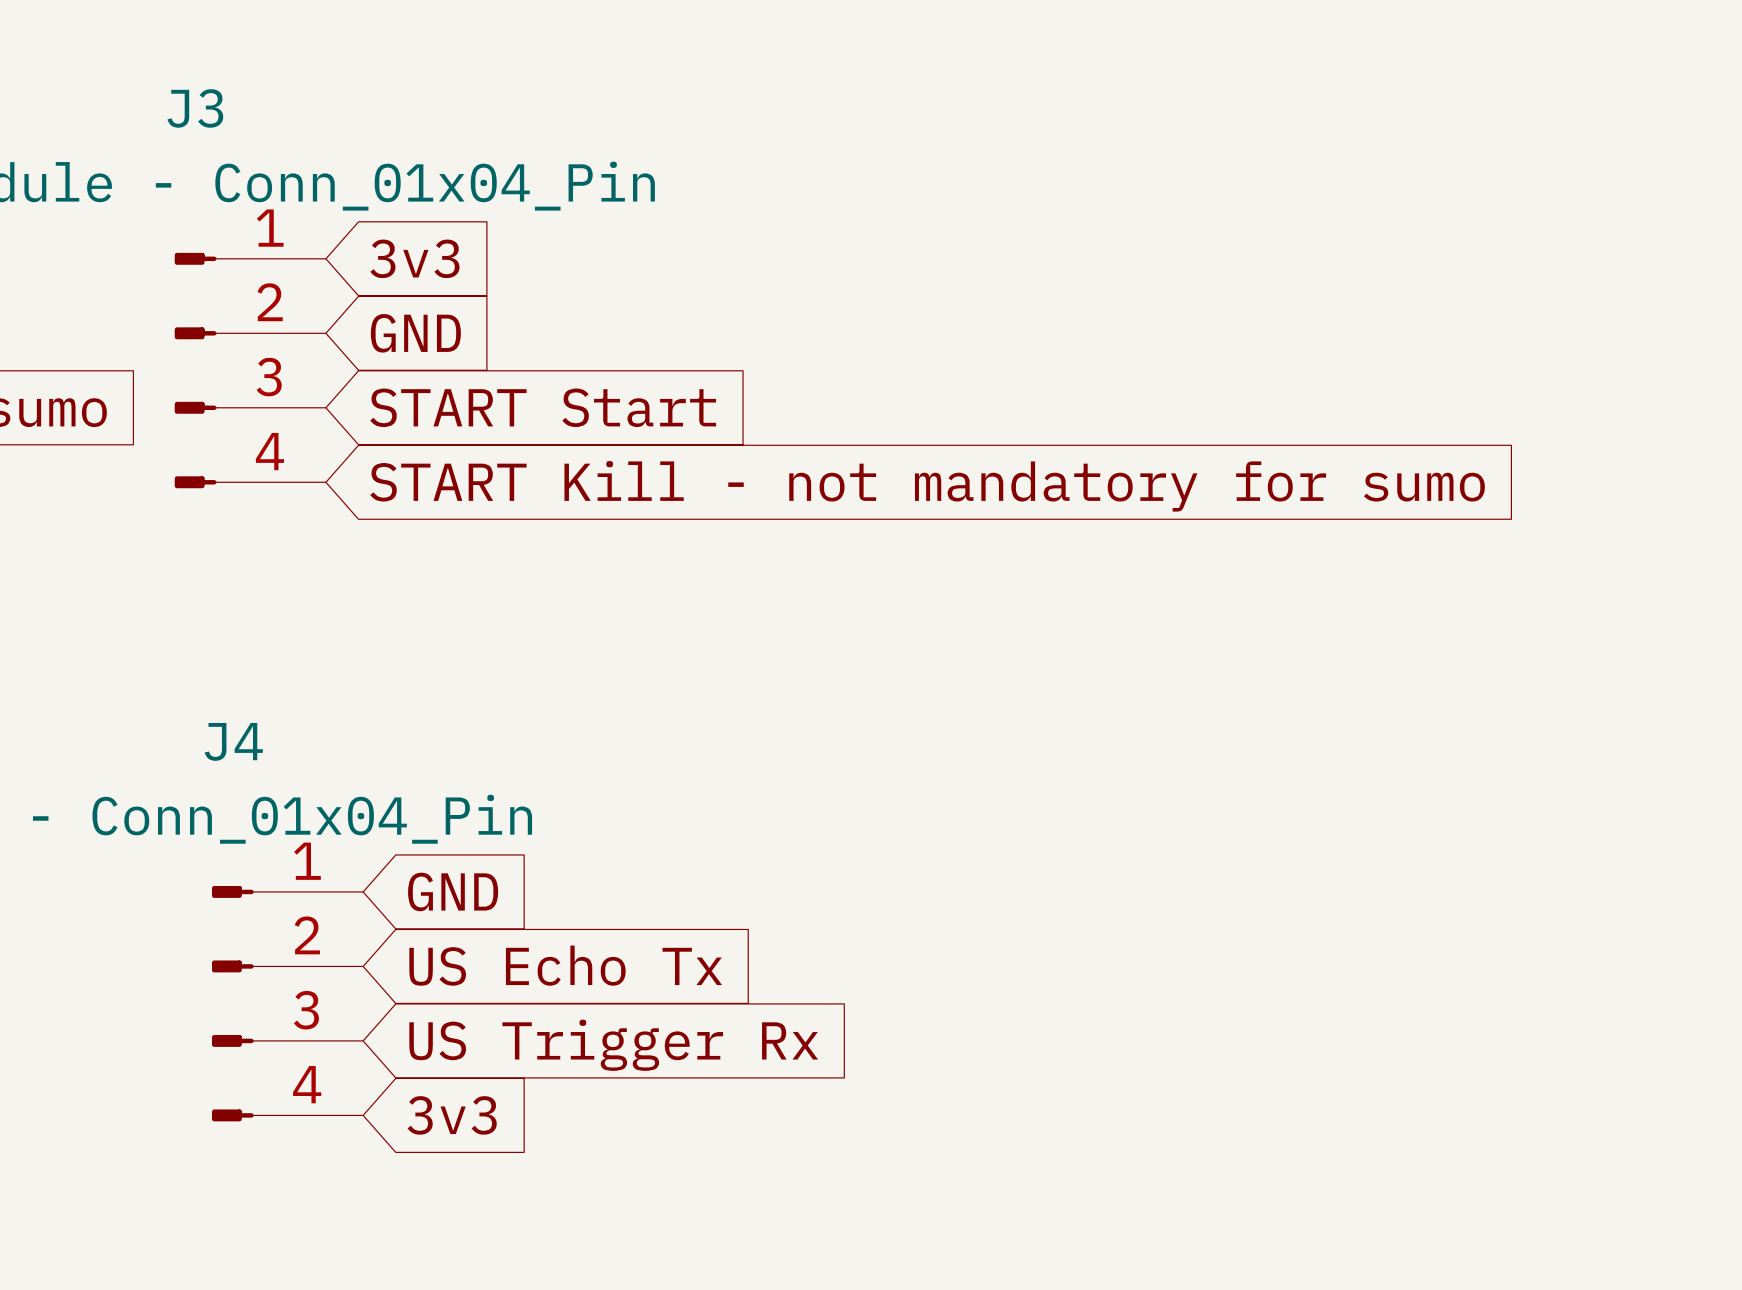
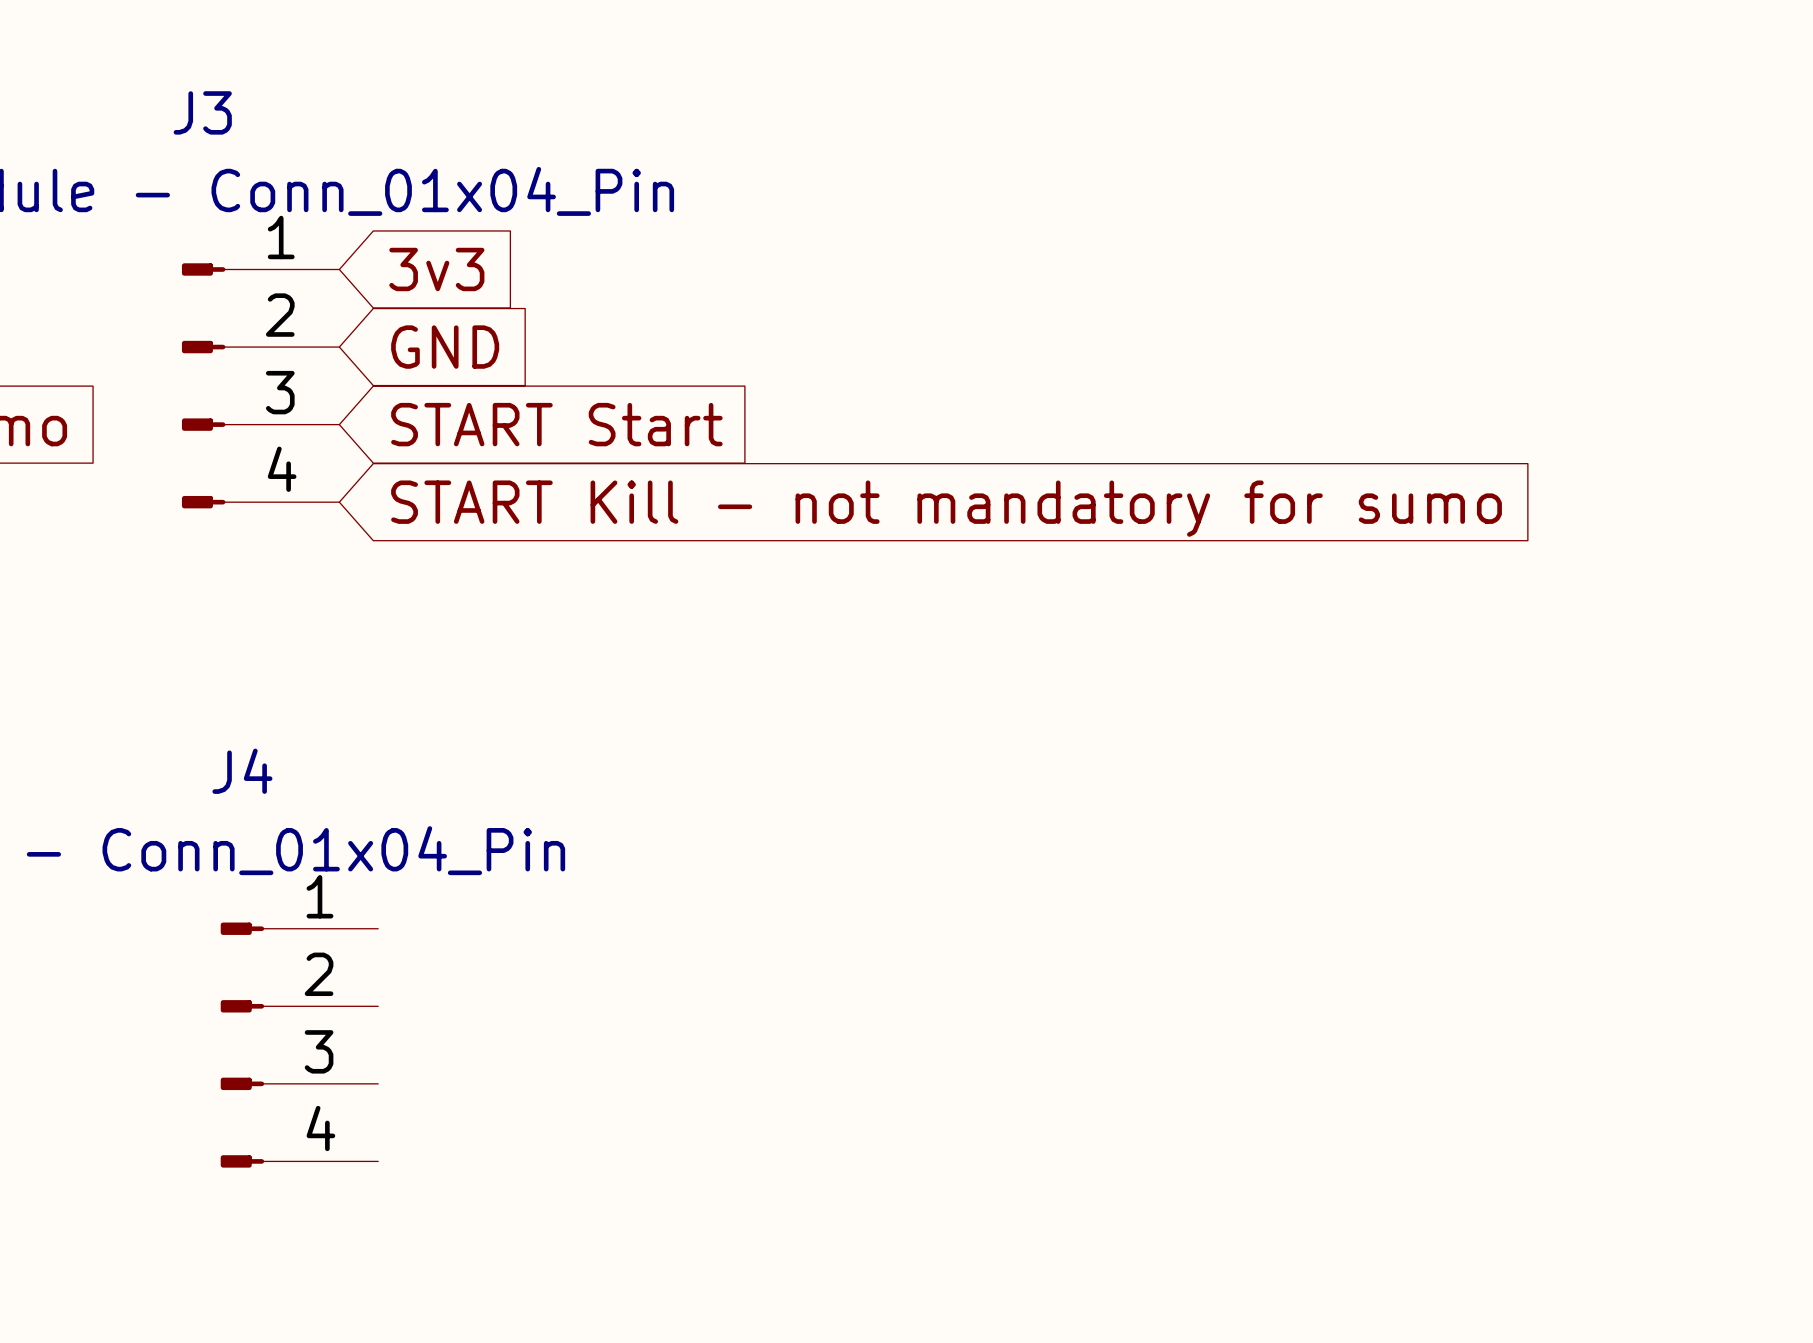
global label: GND (453, 891) -> none
global label: US Echo Tx (565, 965) -> none
global label: US Trigger Rx (613, 1045) -> none
global label: 3v3 (452, 1115) -> none

